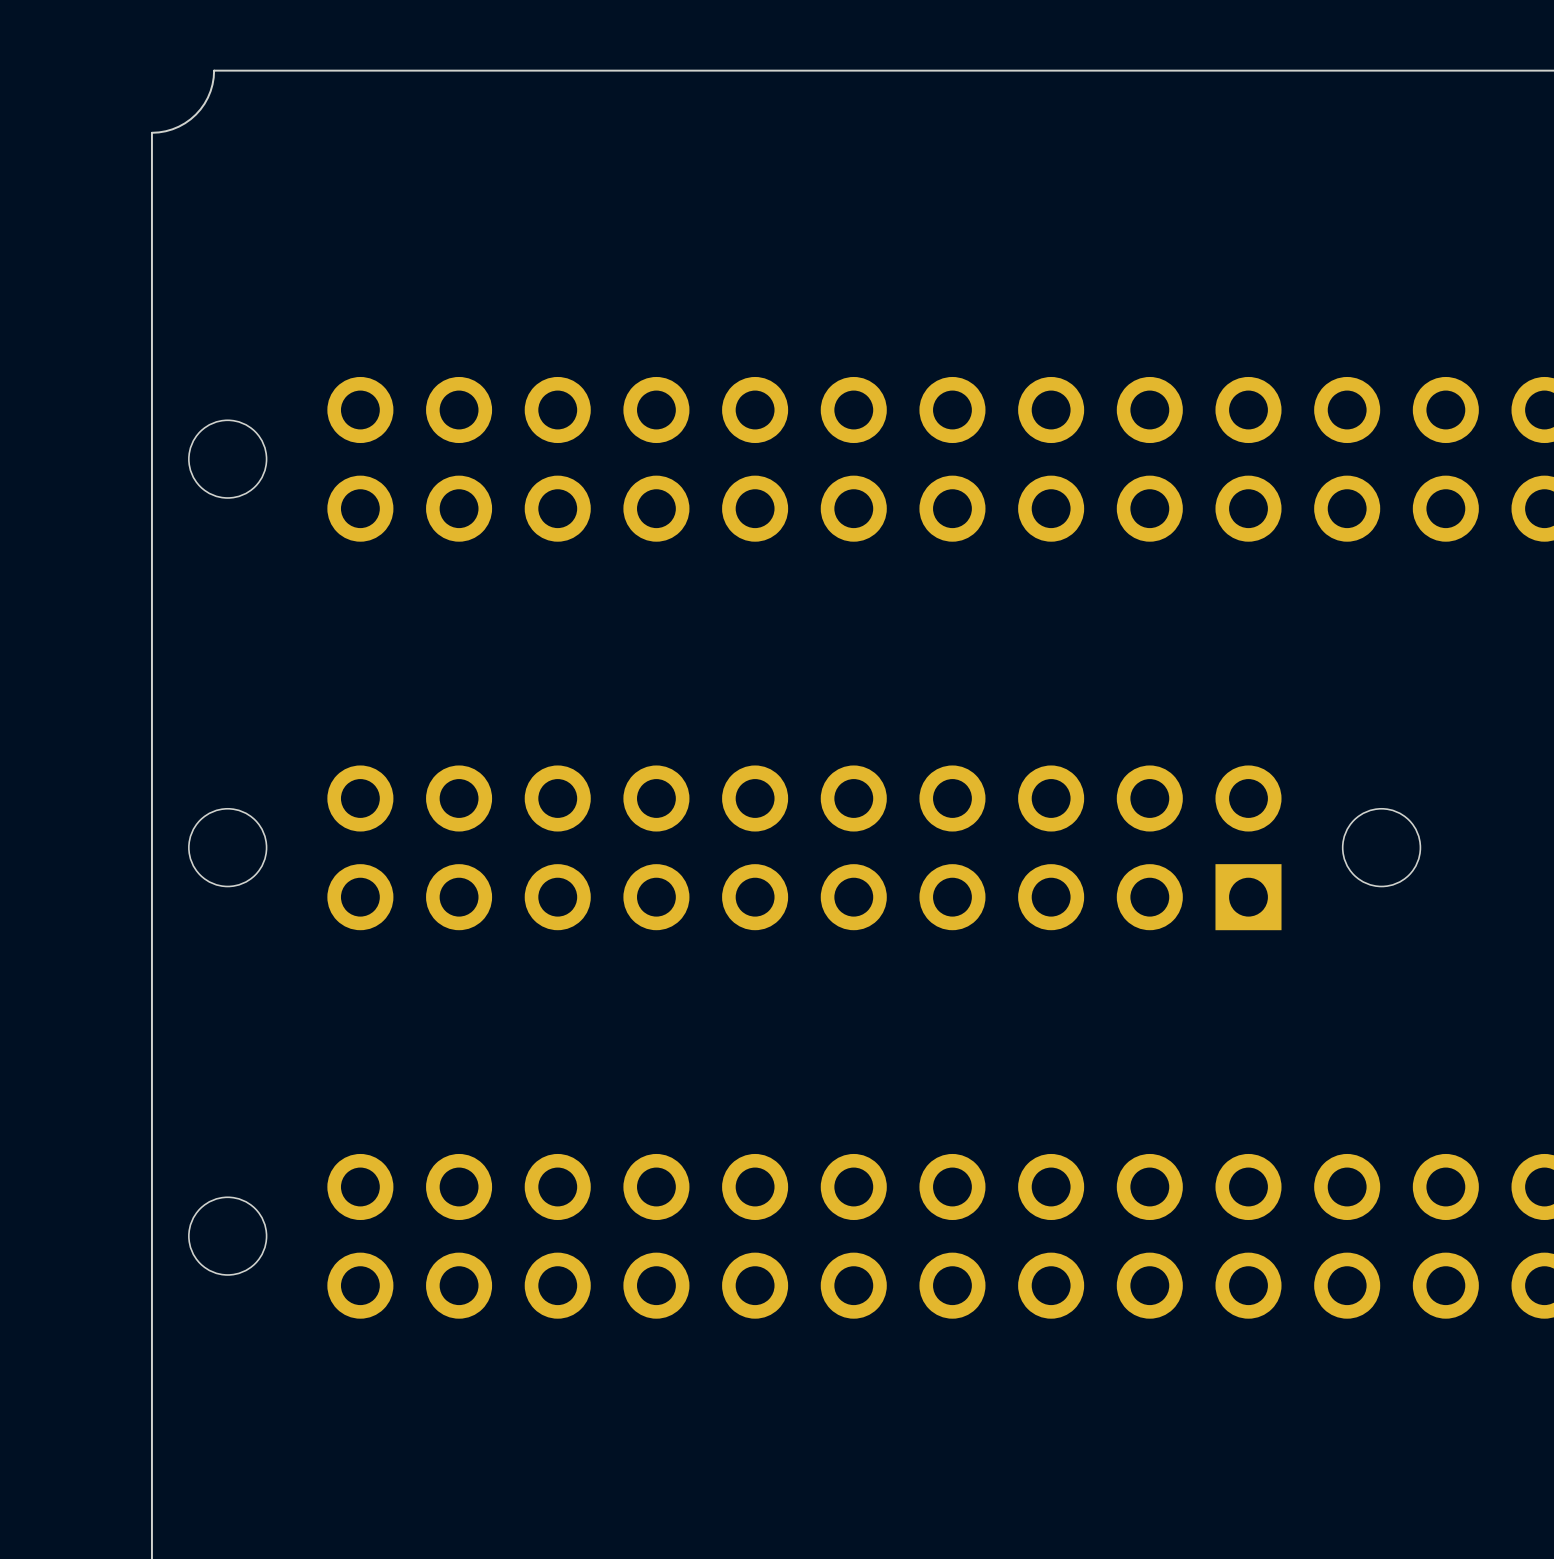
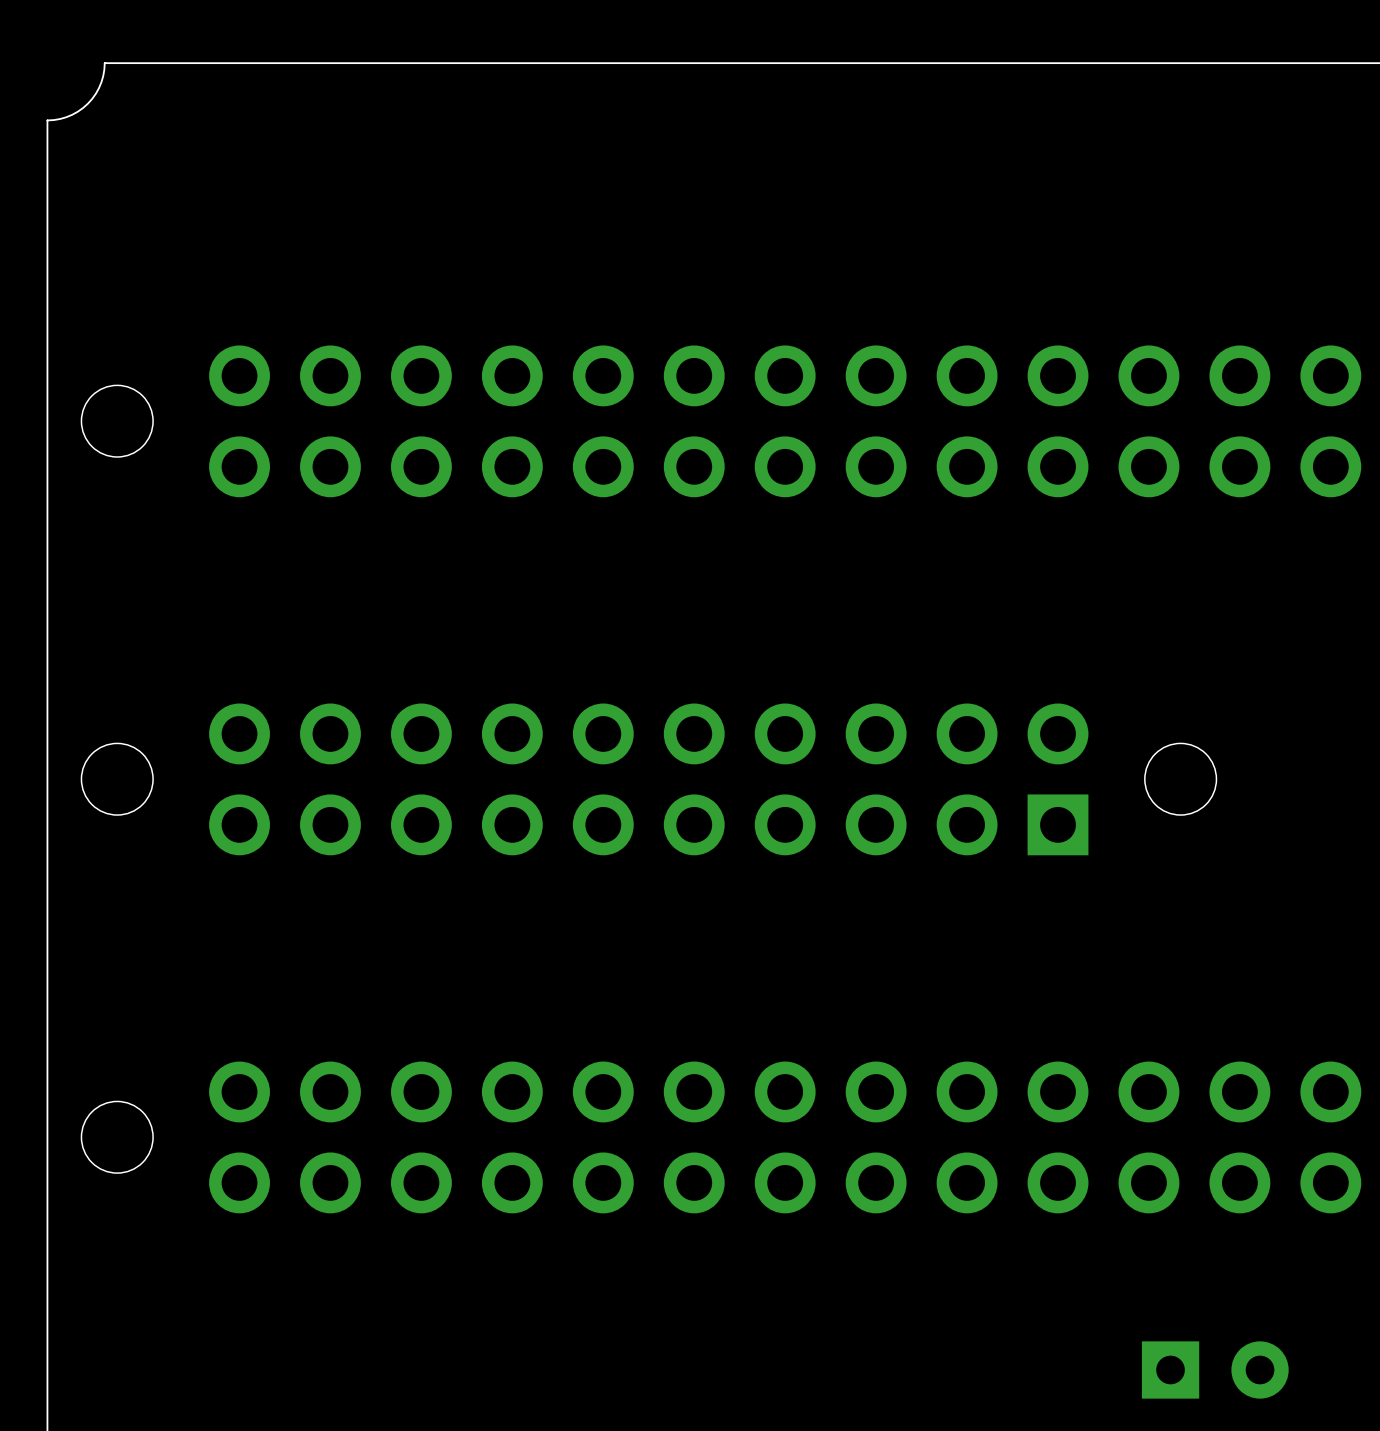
part: none -> (1215, 1370)

